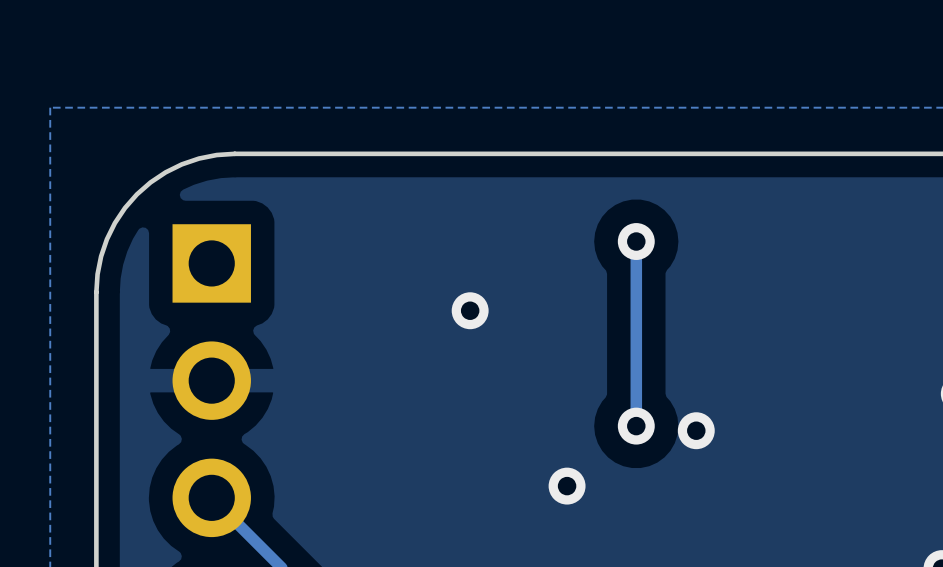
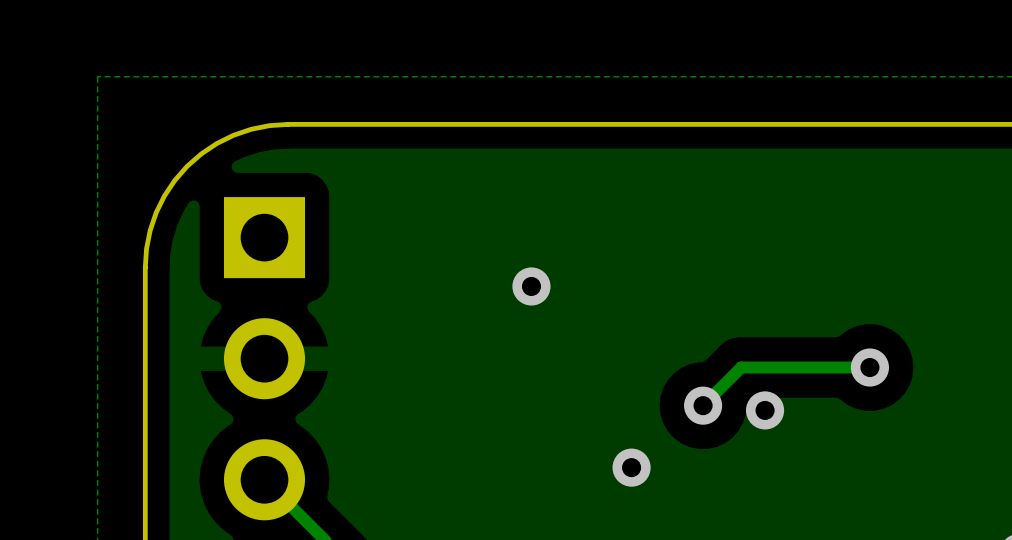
track: (636, 241) (636, 426) -> (869, 367) (741, 367) (703, 405)
via position: (636, 241) -> (869, 367)

